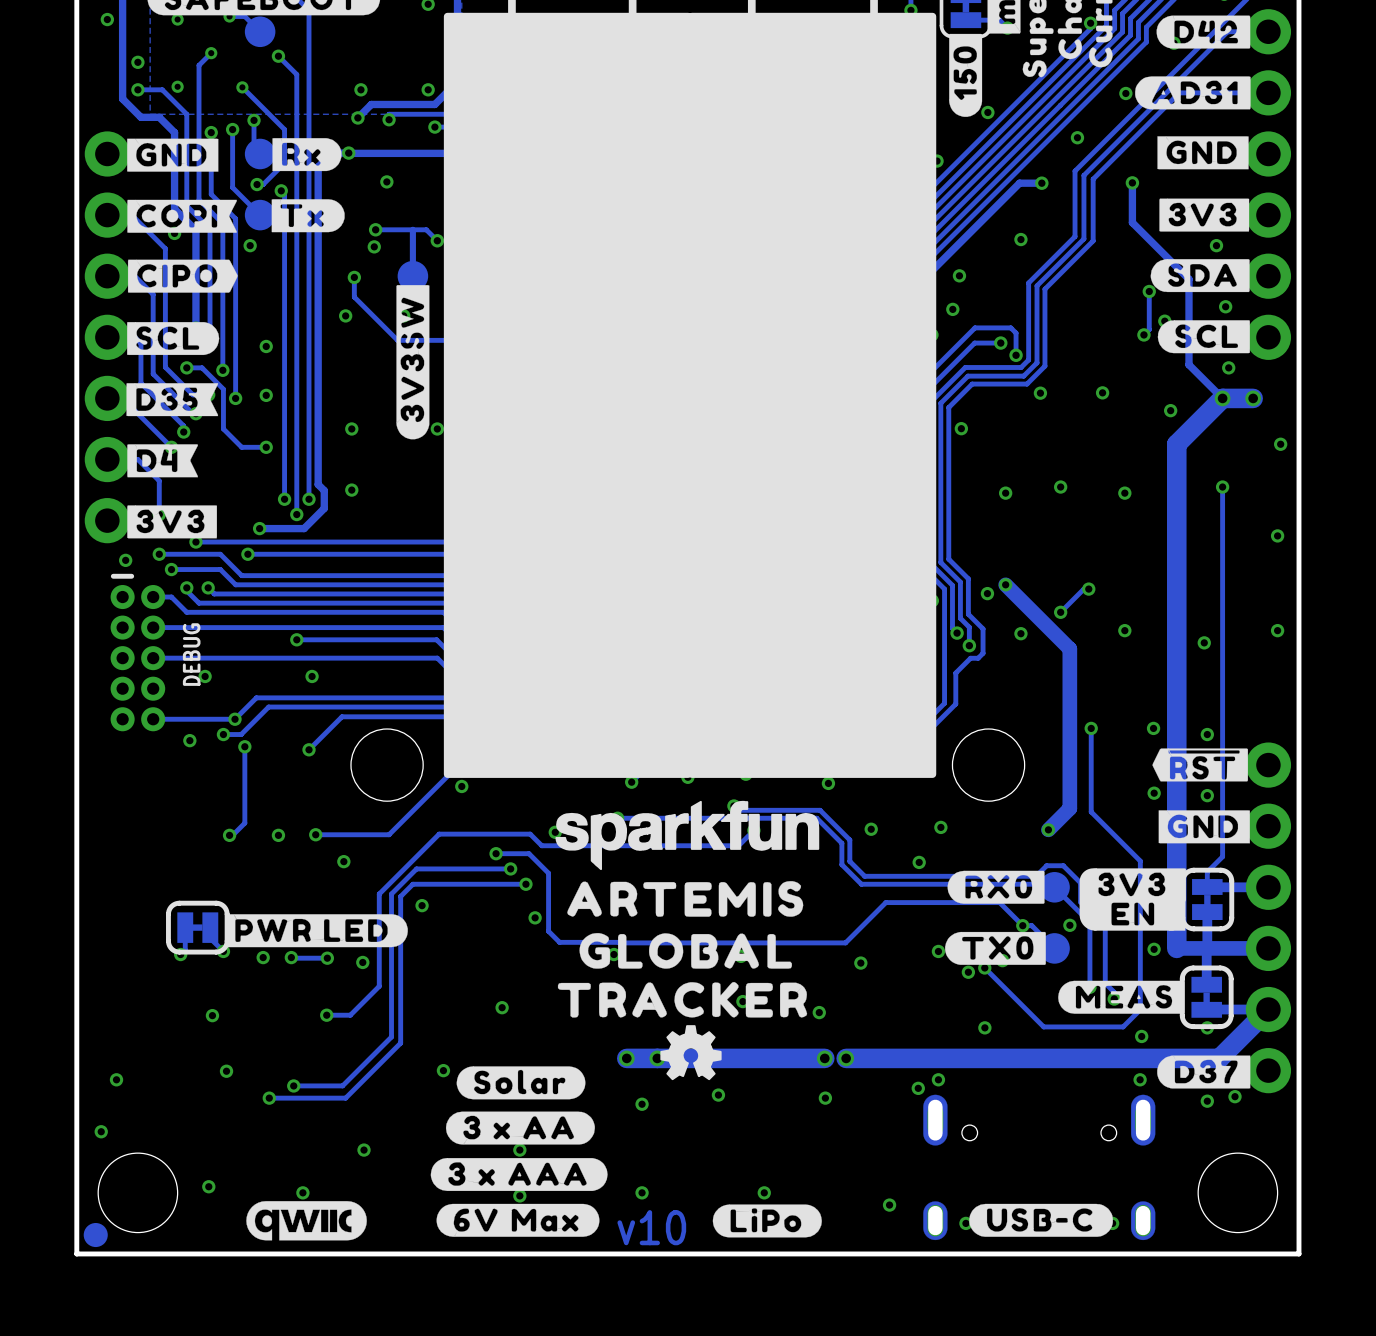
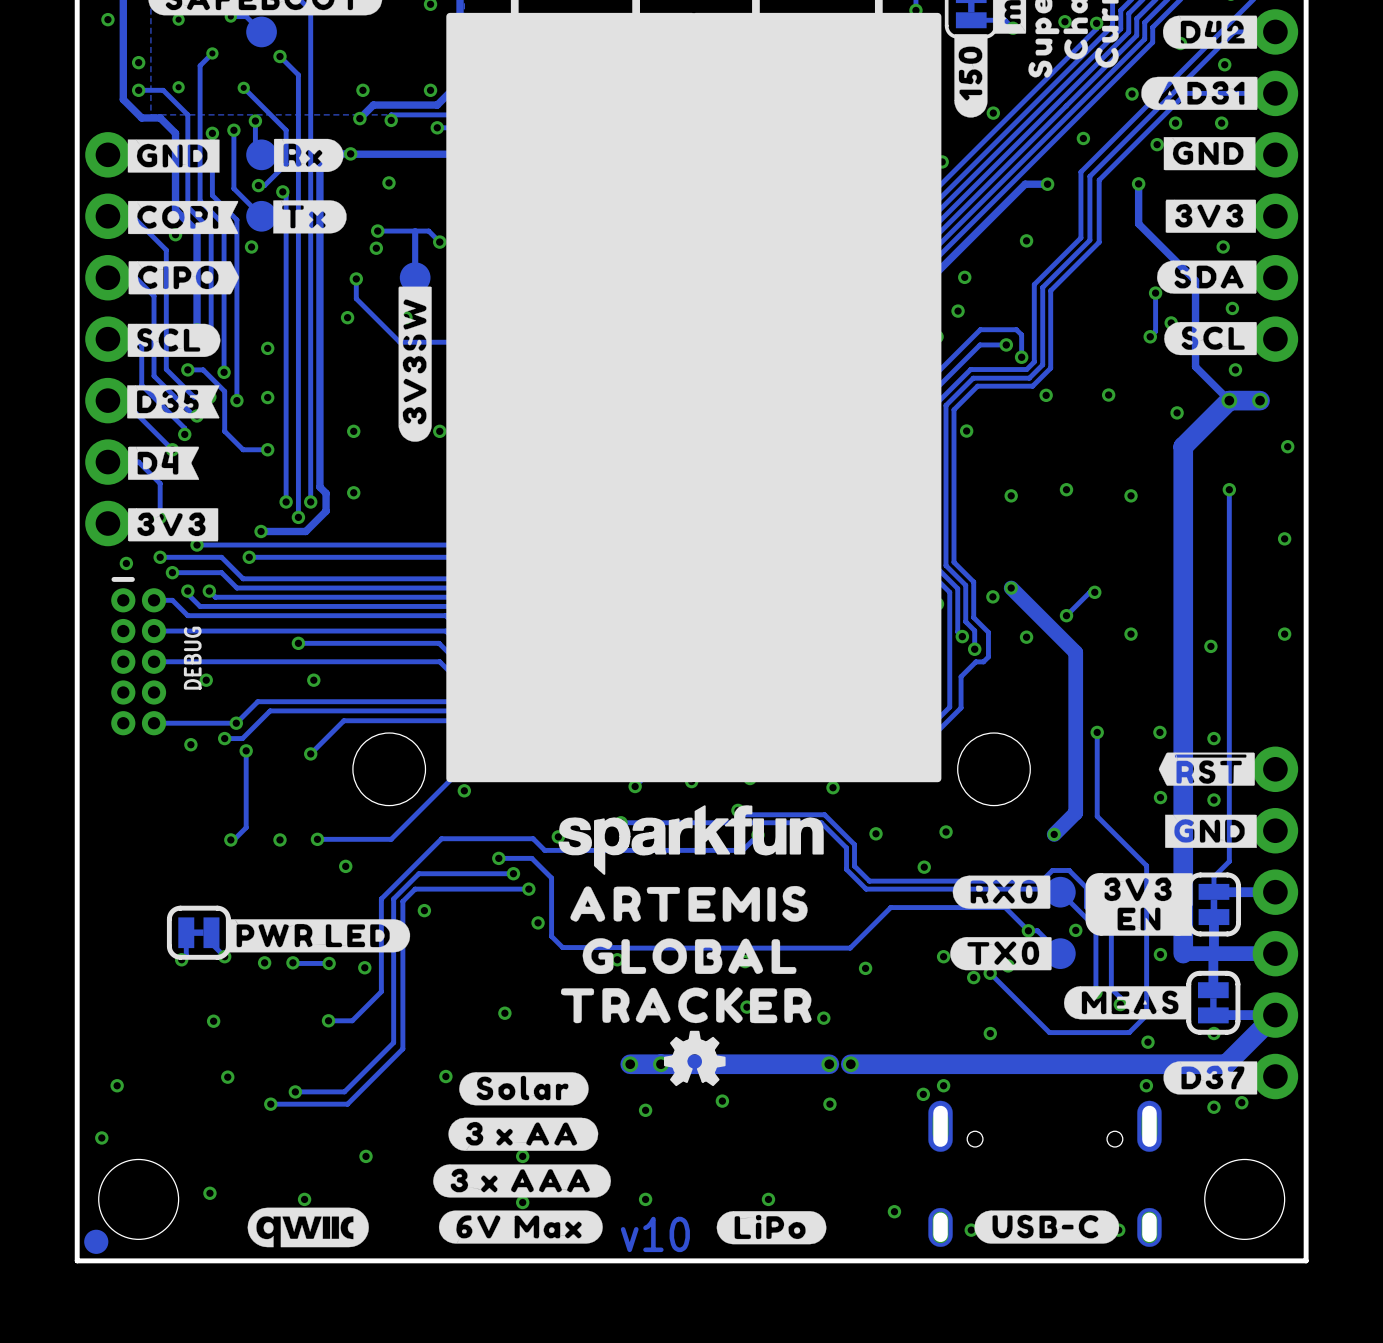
via: none -> (1064, 21)
via: none -> (1224, 64)
via: none -> (1175, 123)
via: none -> (1221, 123)
via: none -> (1157, 144)

